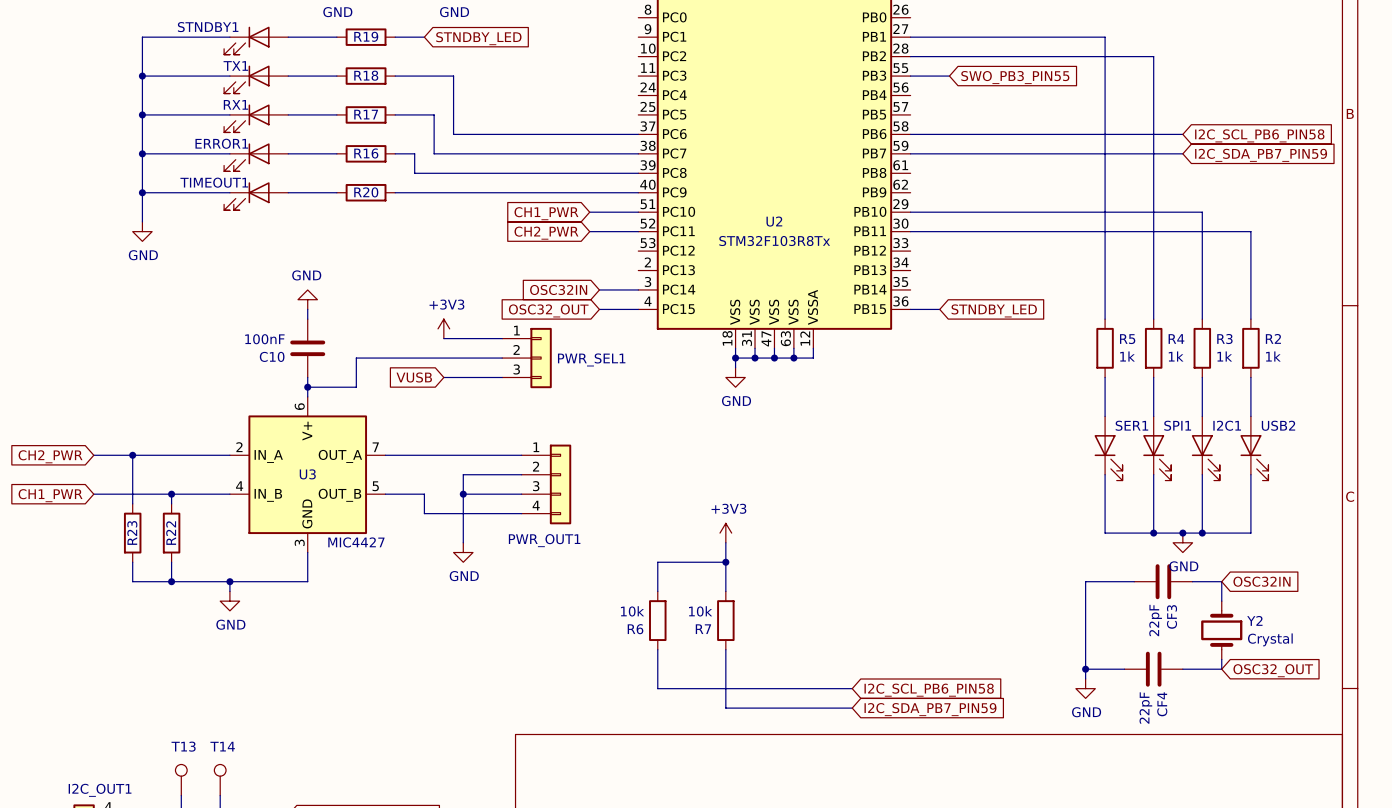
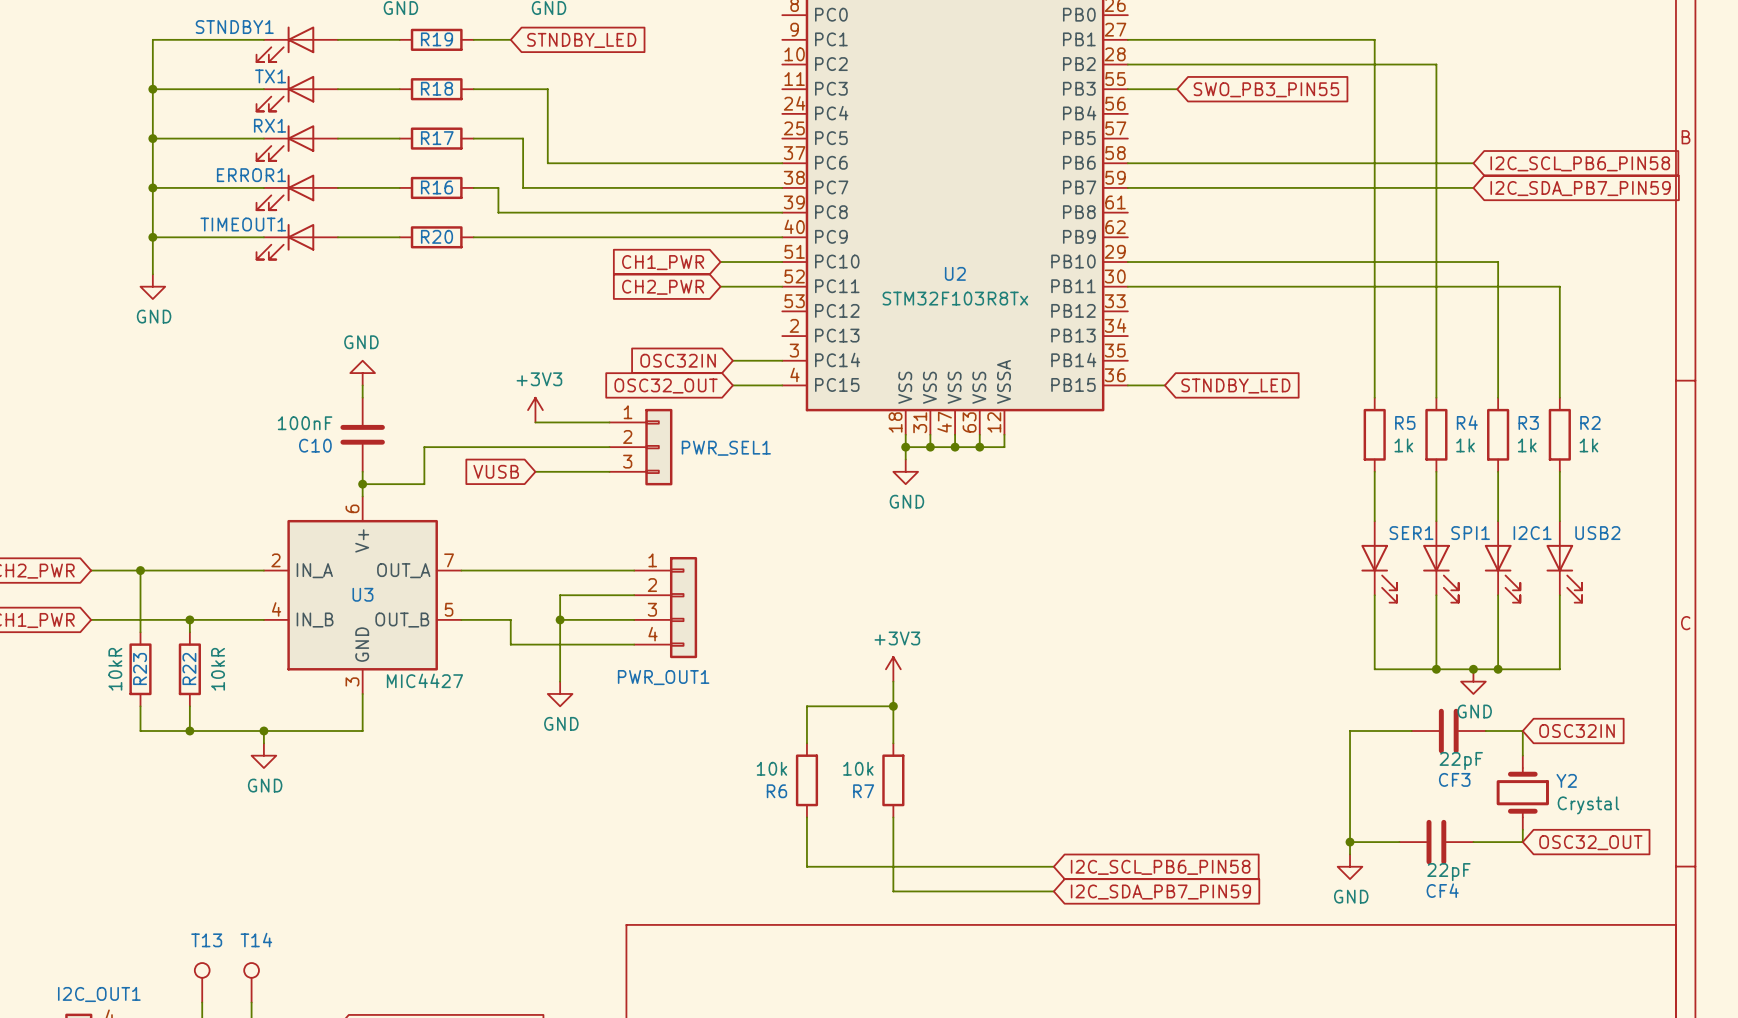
R23 value: none -> 10kR (115, 669)
R22 value: none -> 10kR (218, 669)
CF3 name rotation: 0° (1172, 616) -> 90° clockwise (1454, 779)
CF3 value rotation: 0° (1155, 620) -> 90° clockwise (1461, 760)
CF4 name rotation: 0° (1162, 704) -> 90° clockwise (1442, 890)
CF4 value rotation: 0° (1145, 708) -> 90° clockwise (1448, 872)

